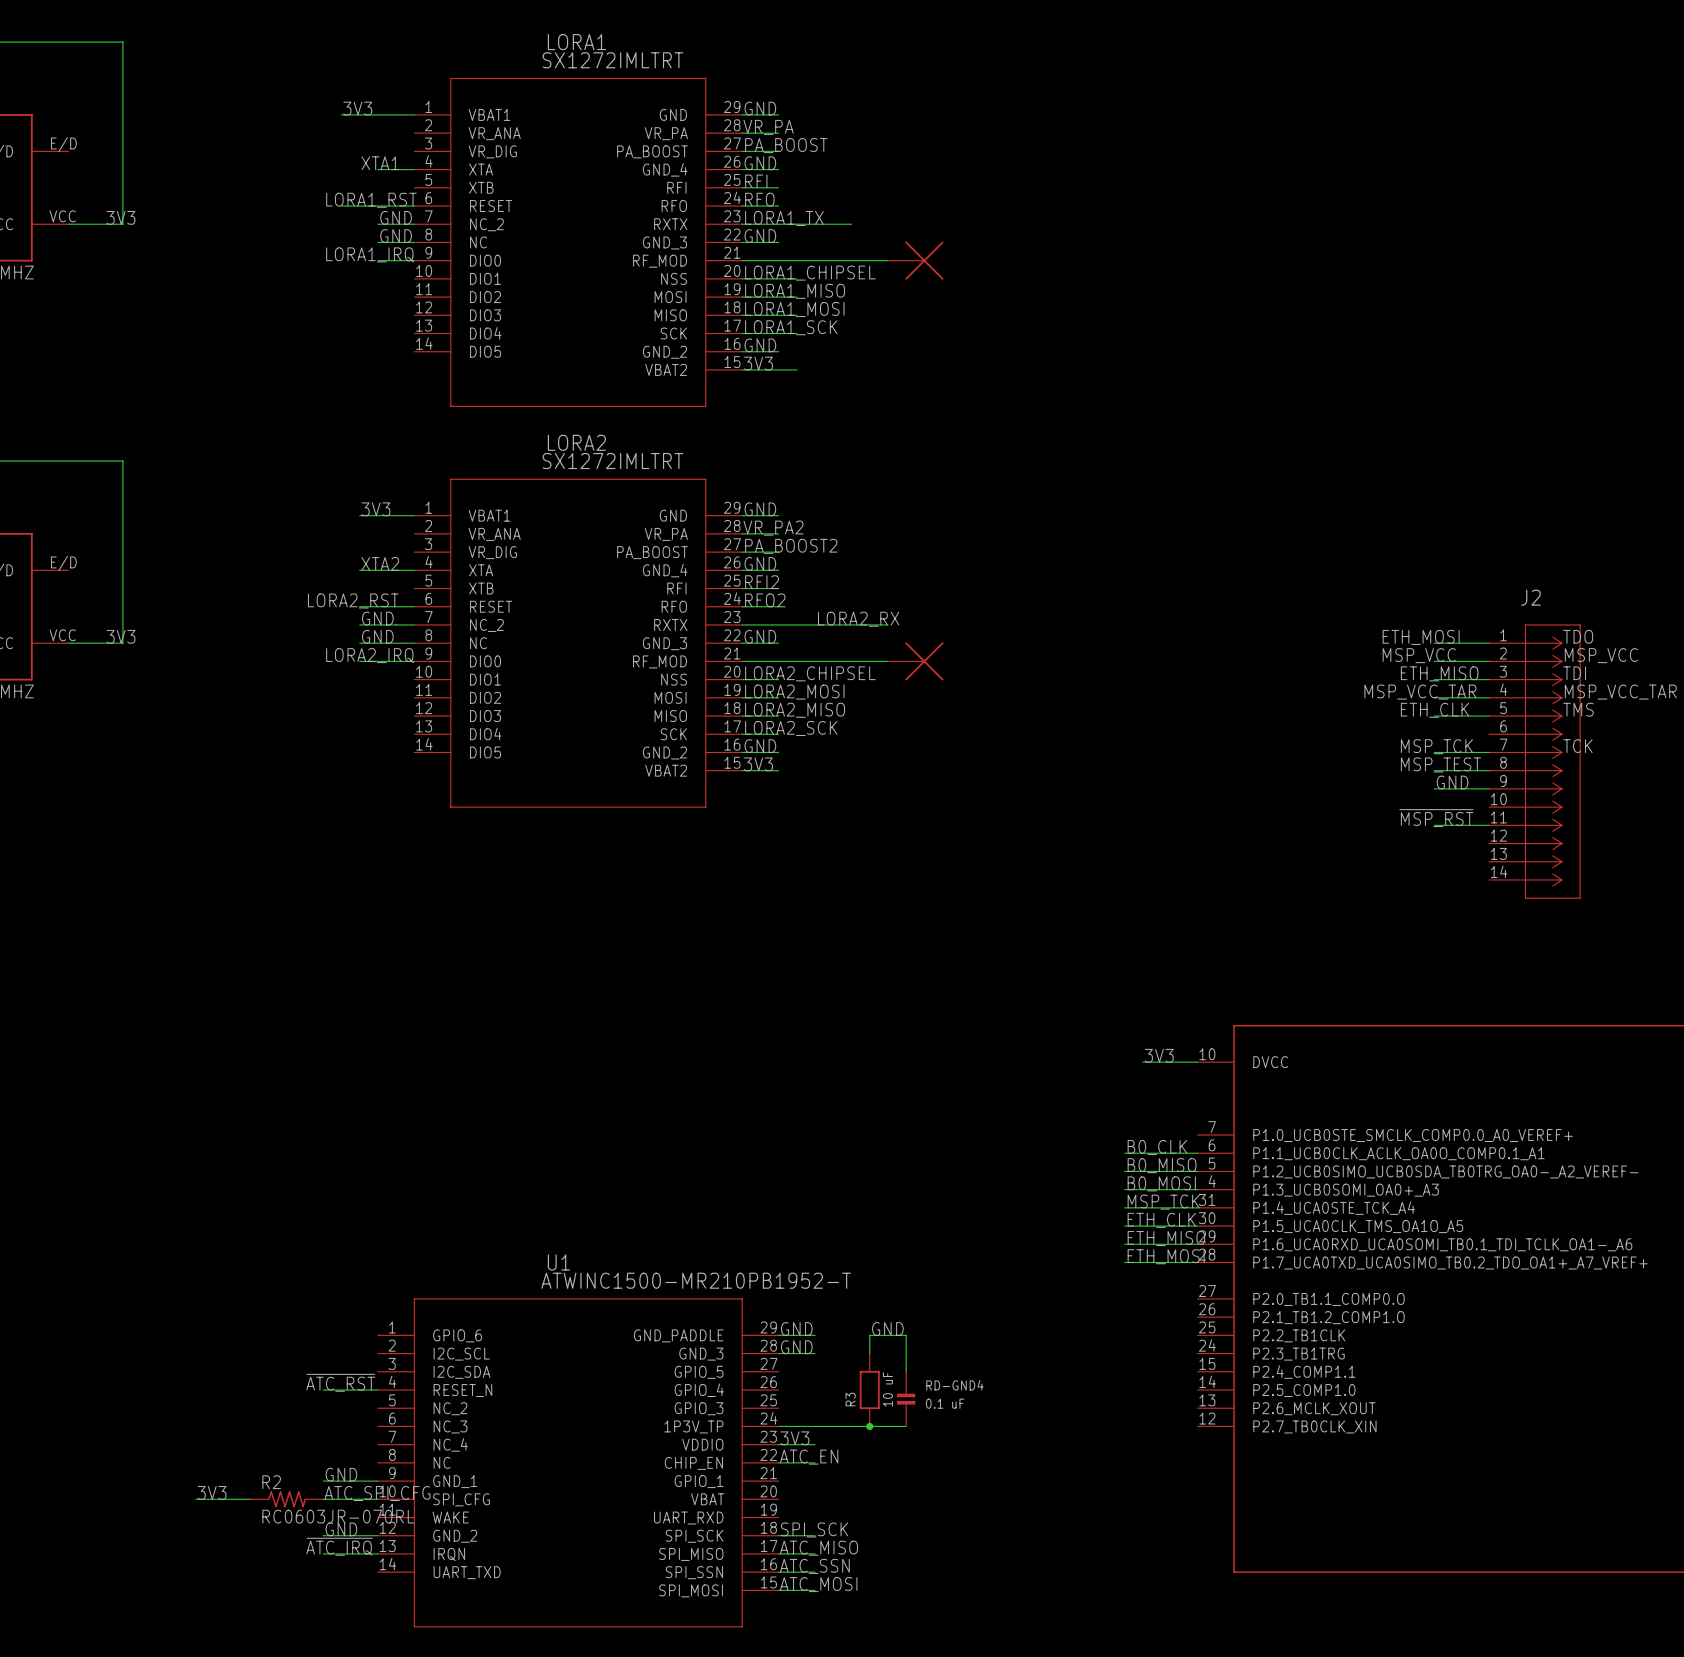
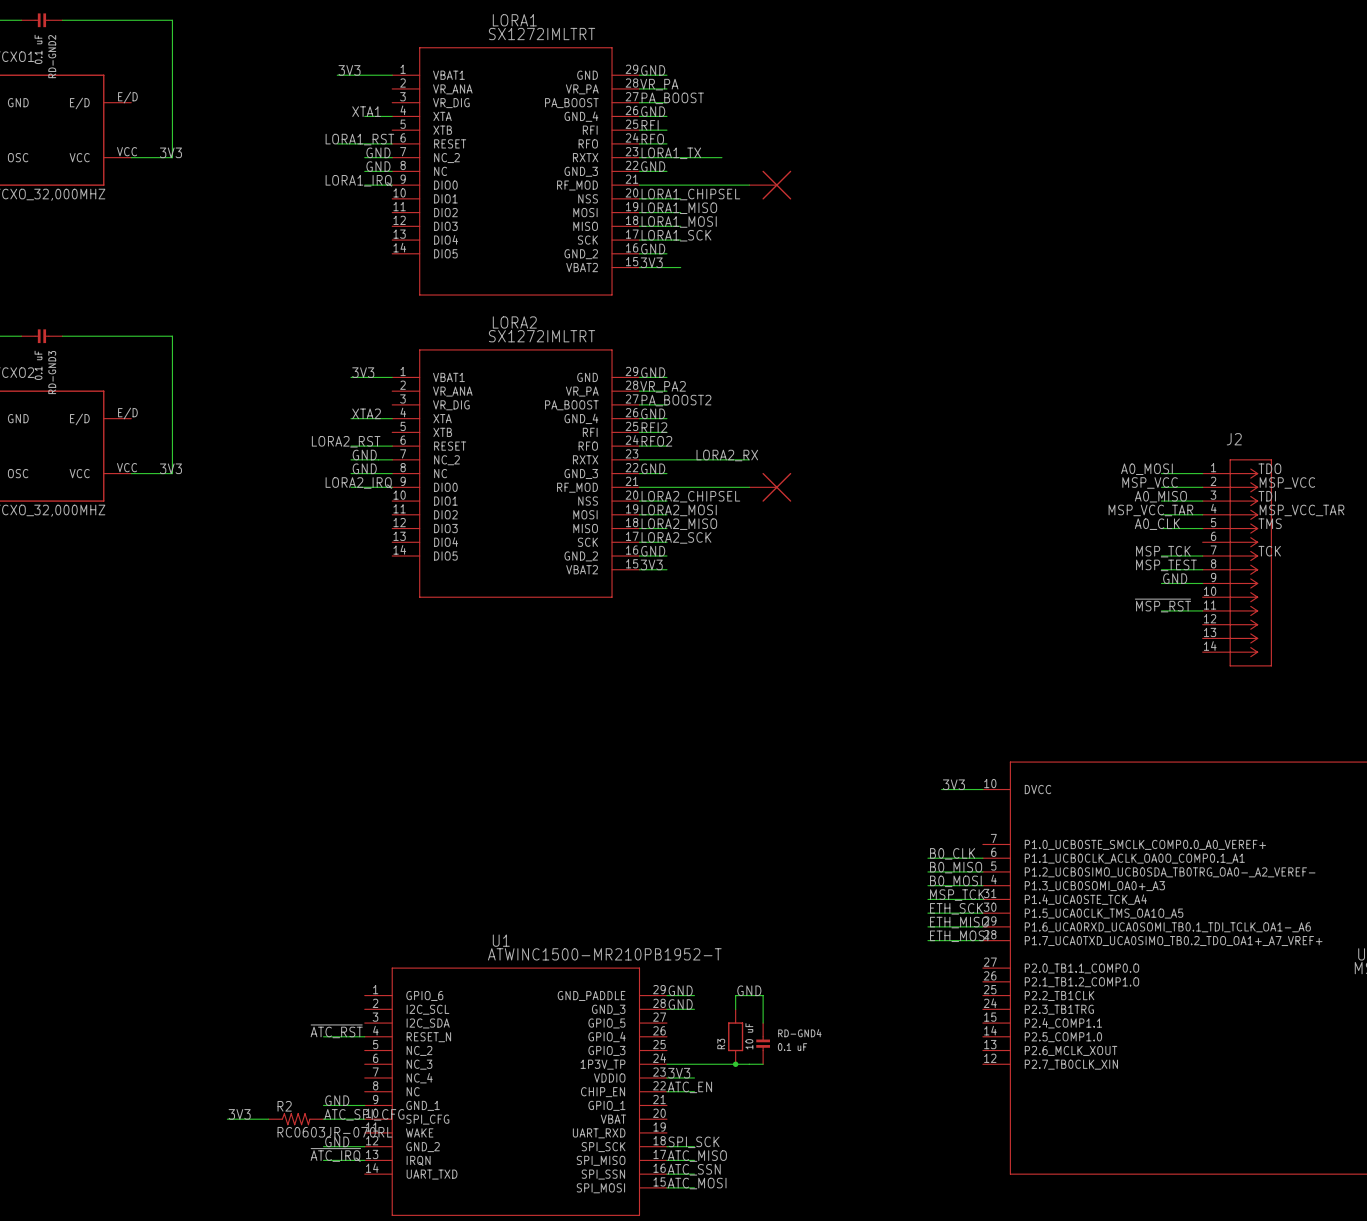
label: ETH_MOSI (1421, 637) -> A0_MOSI (1146, 469)
label: ETH_MISO (1439, 673) -> A0_MISO (1160, 496)
label: ETH_CLK (1434, 710) -> A0_CLK (1157, 524)
label: ETH_CLK (1161, 1220) -> ETH_SCK (956, 908)

